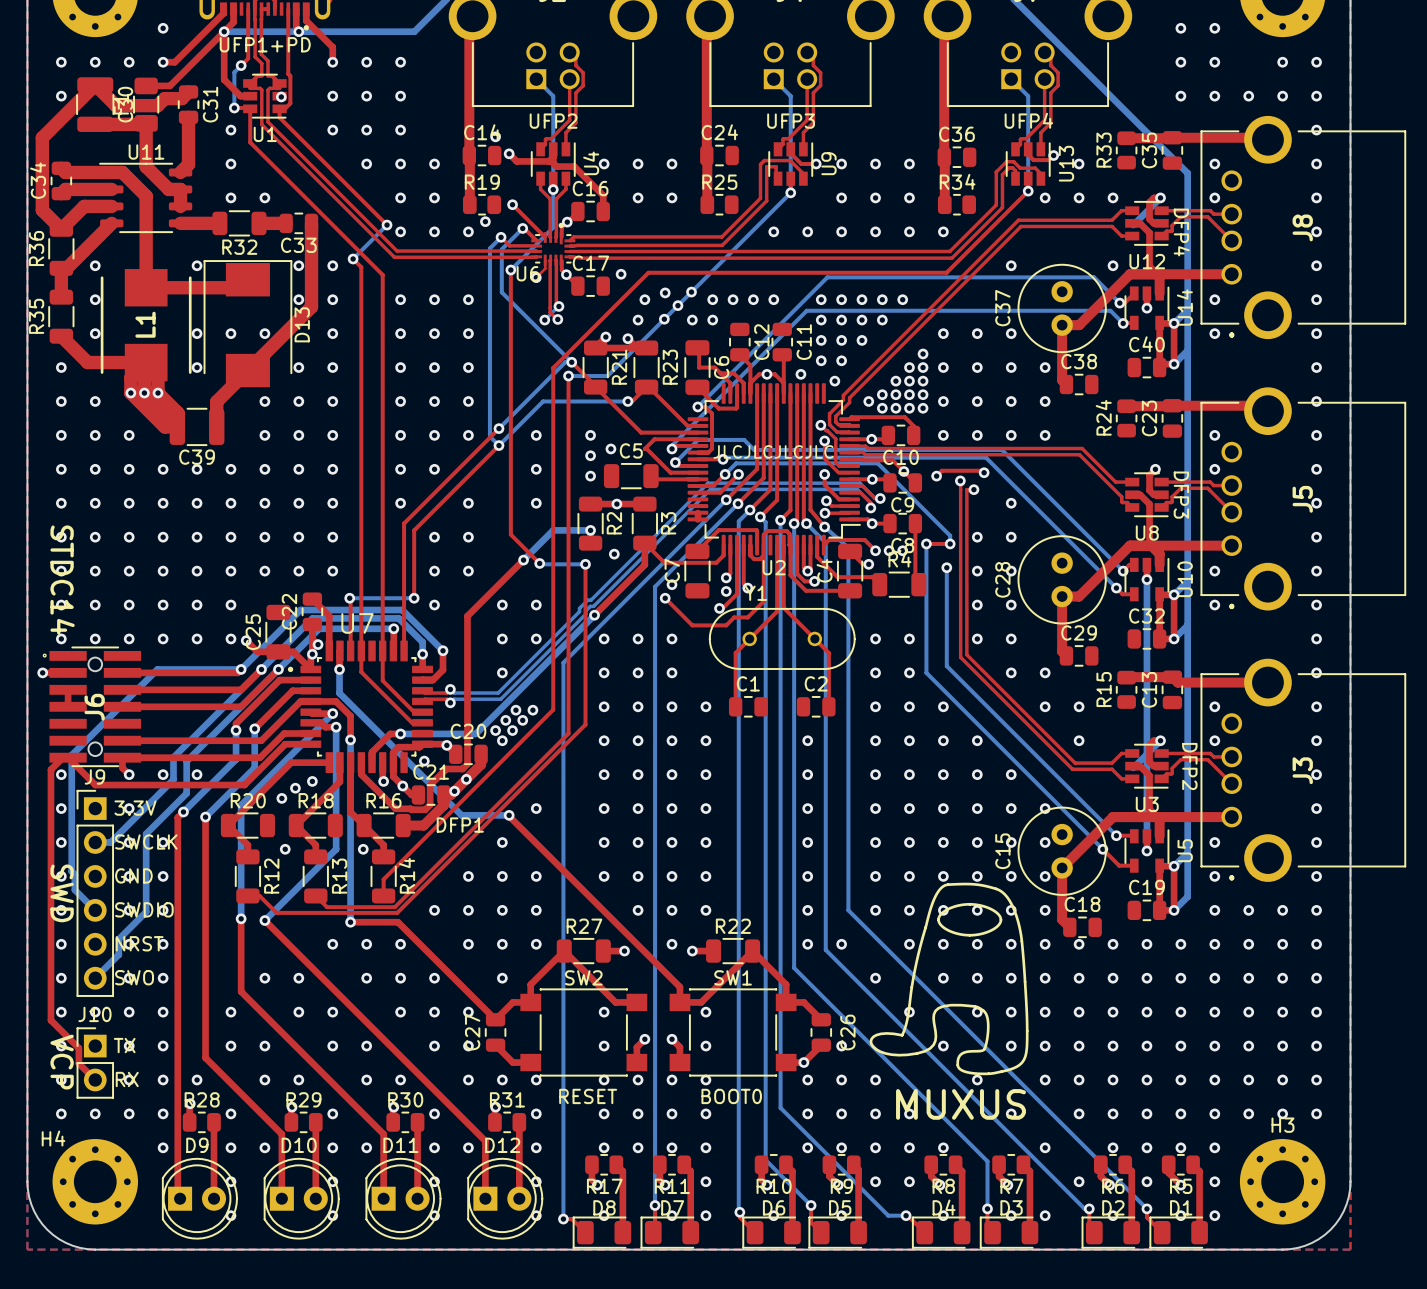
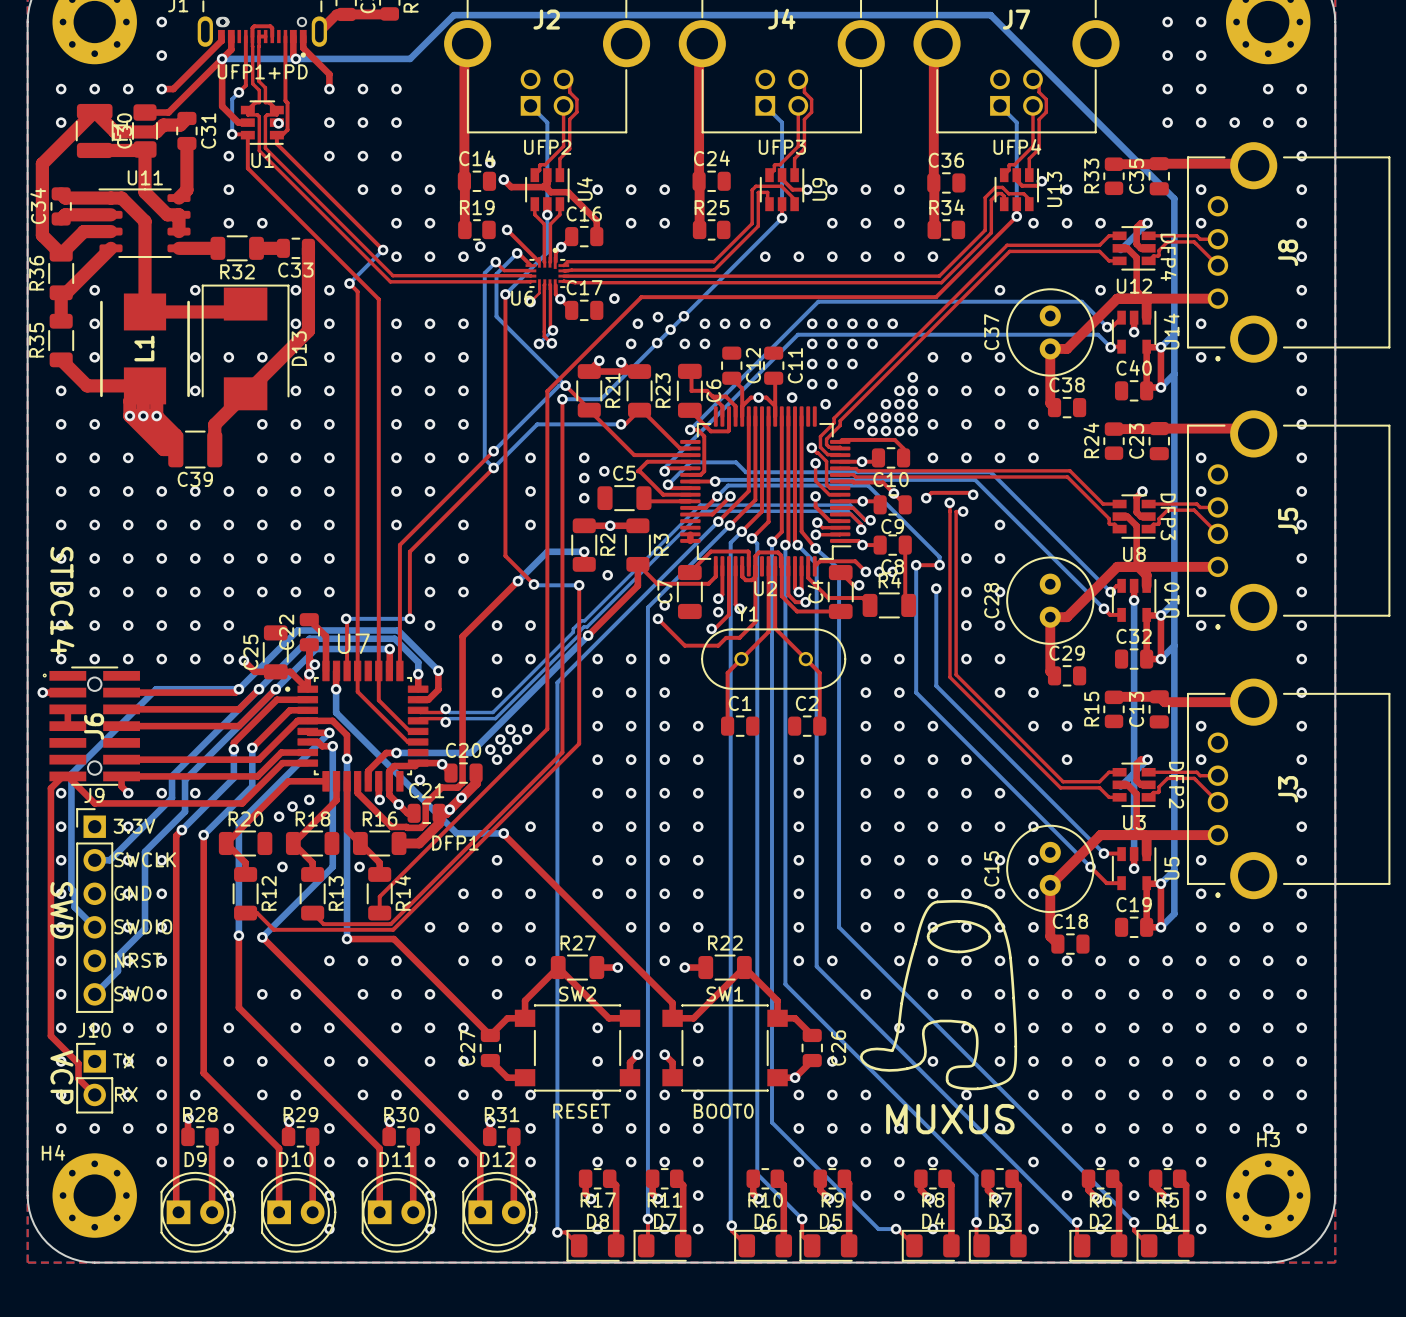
text: JLCJLCJLCJLC (773, 451) -> none

